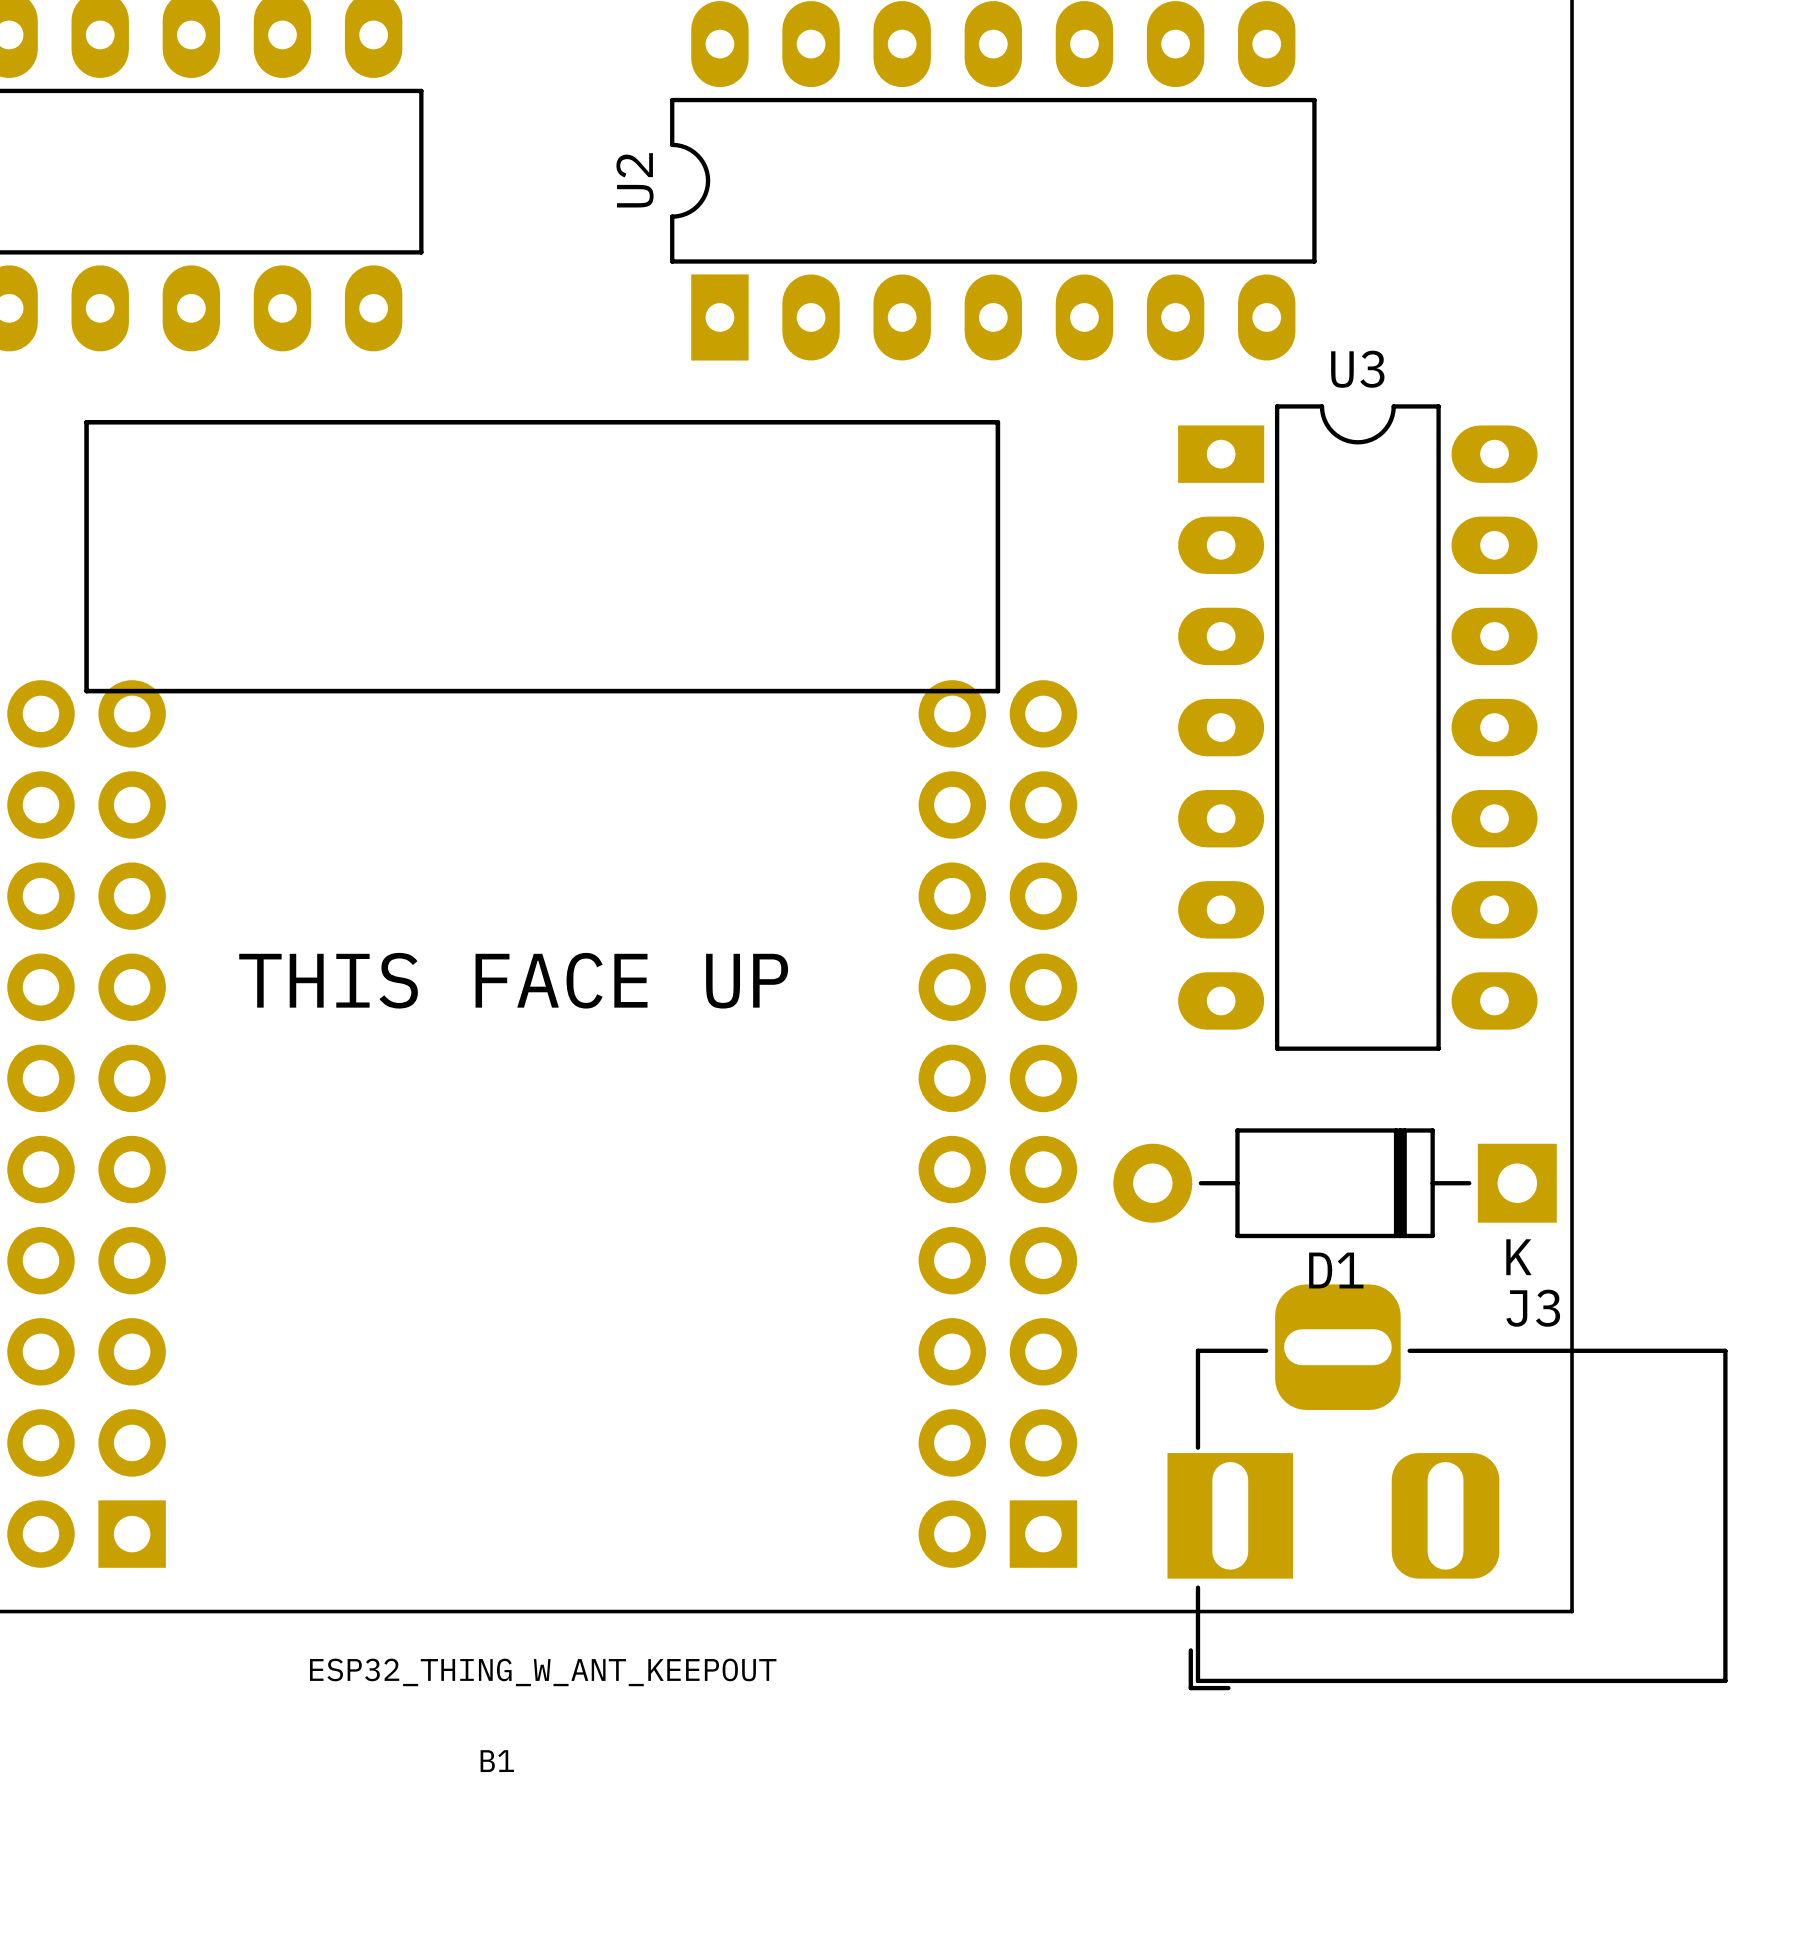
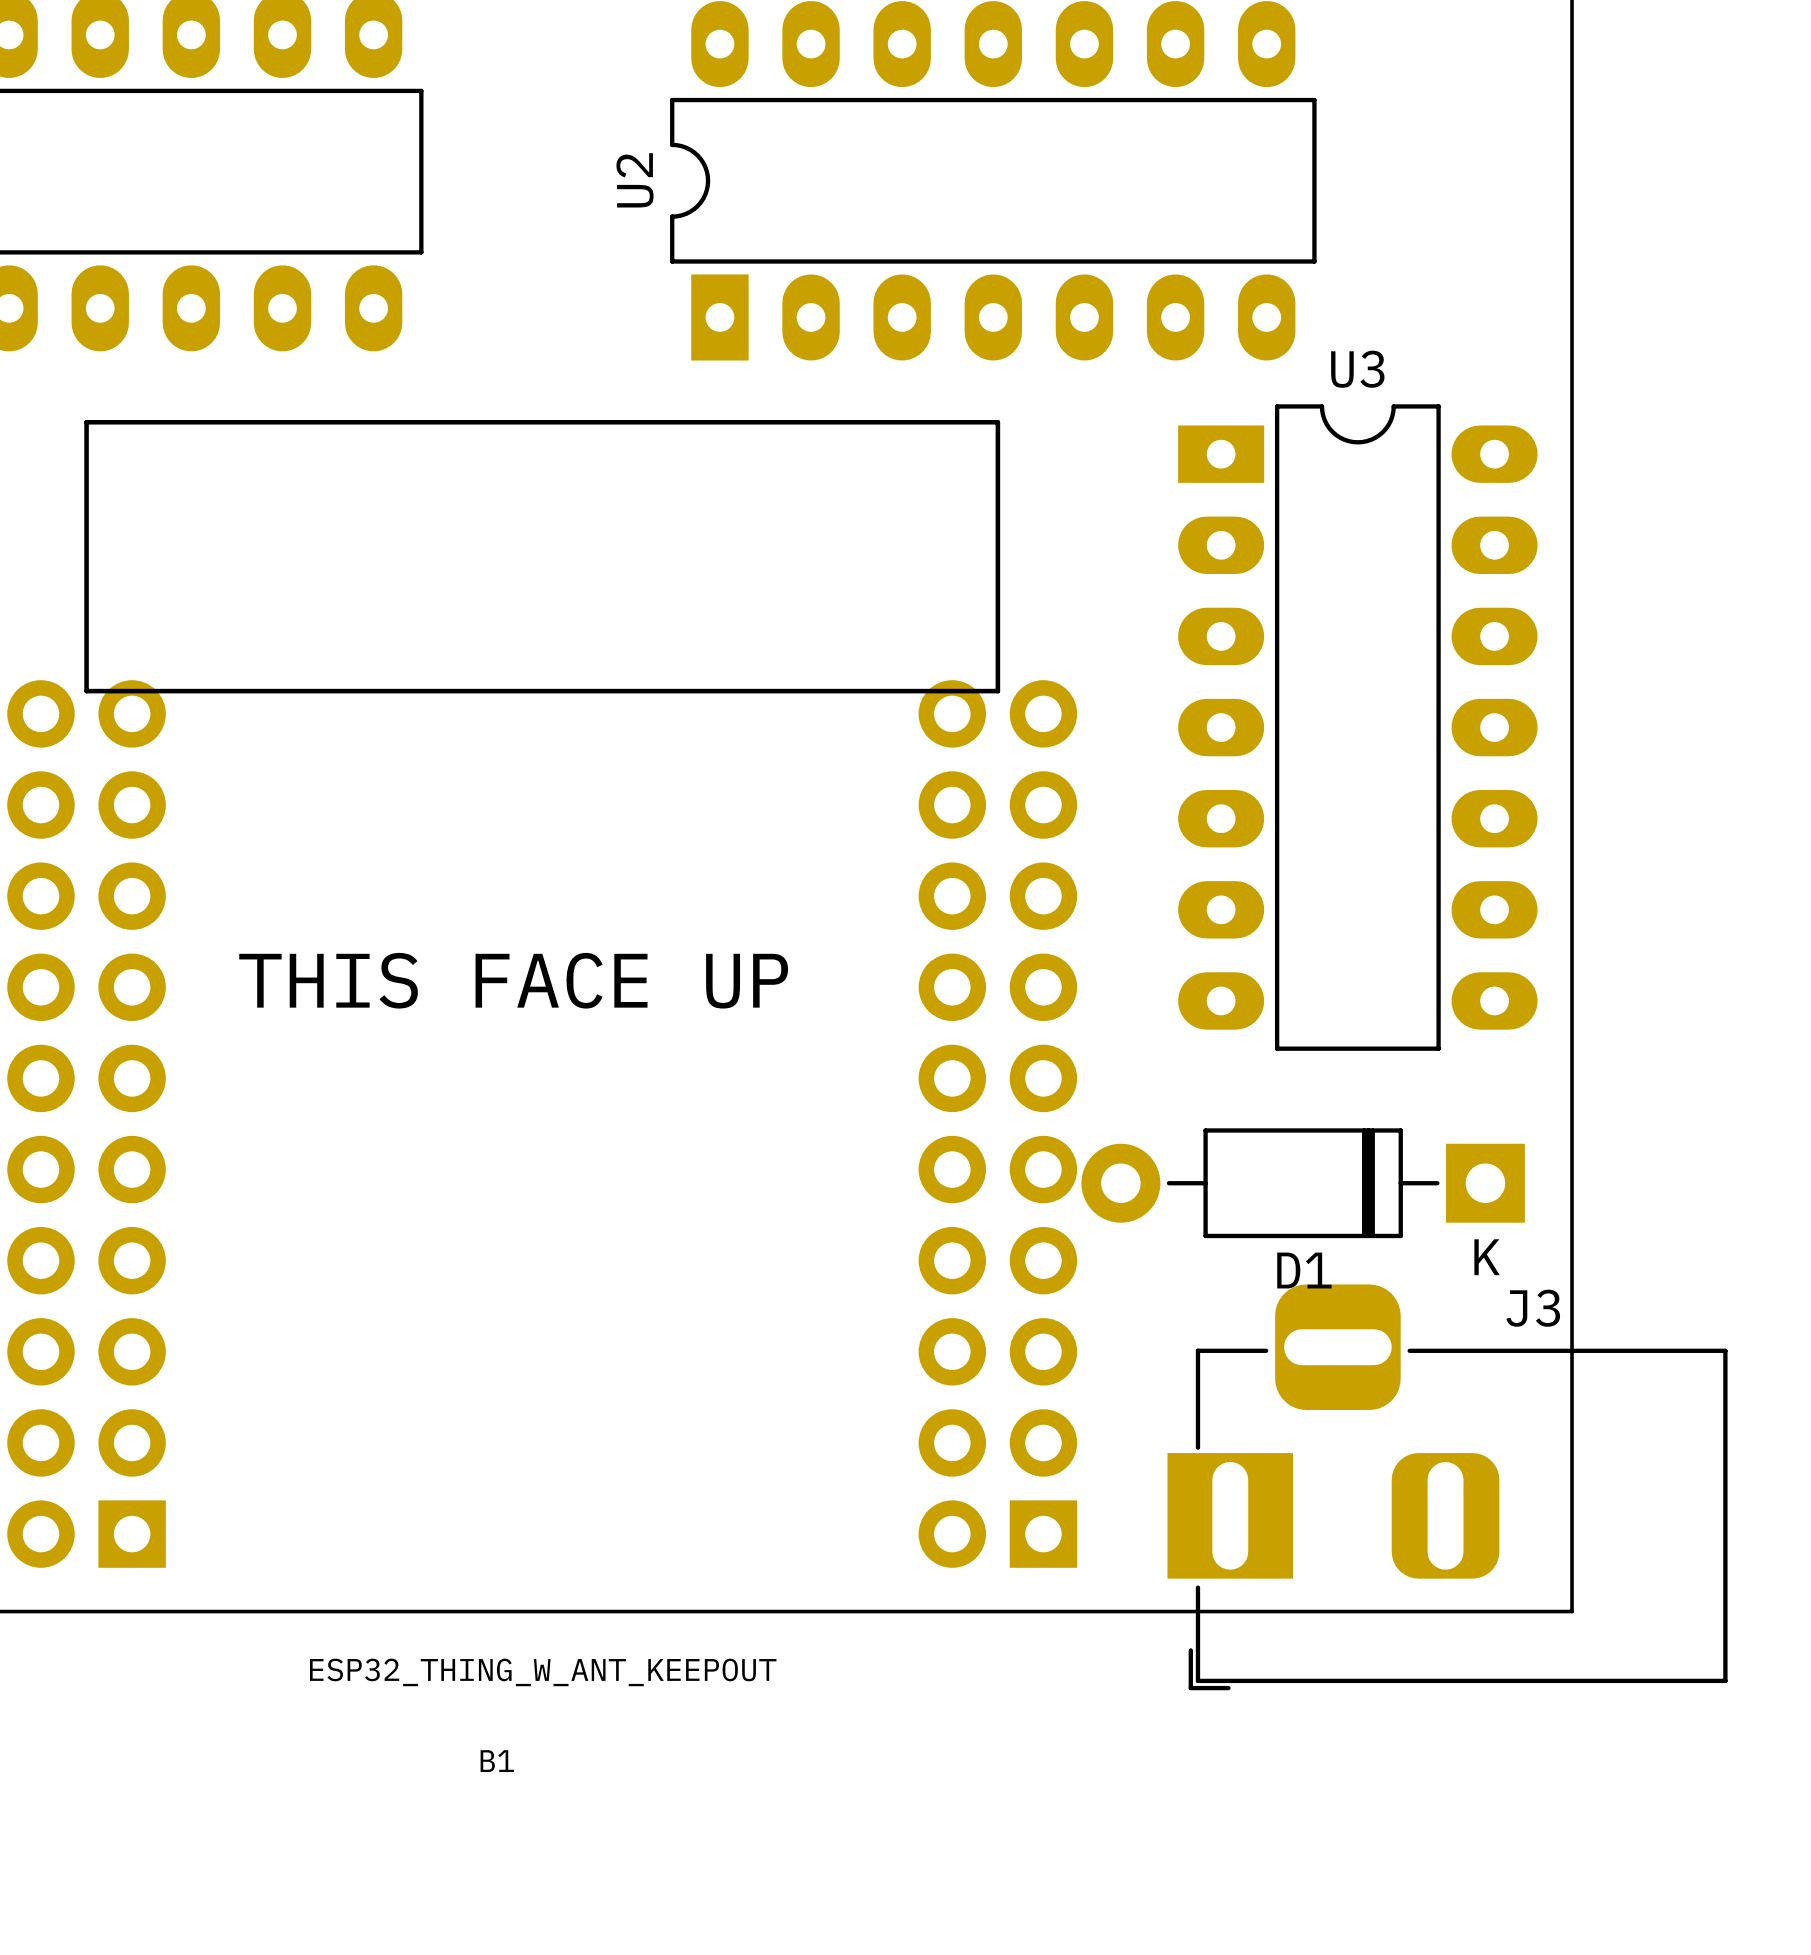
D1 position: (1335, 1183) -> (1303, 1183)

